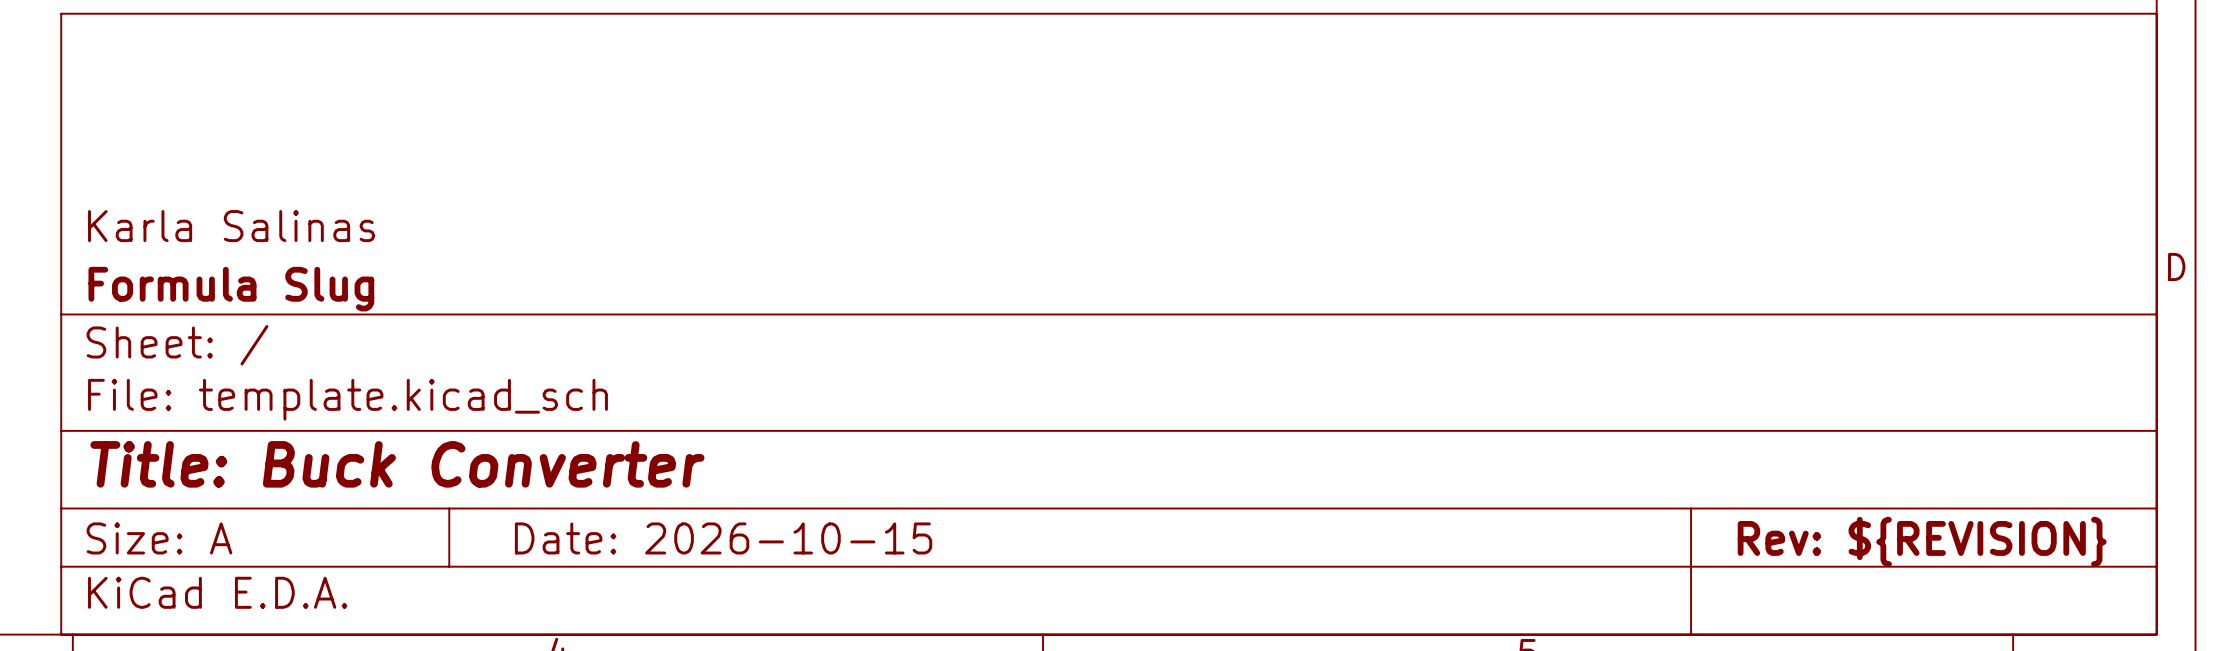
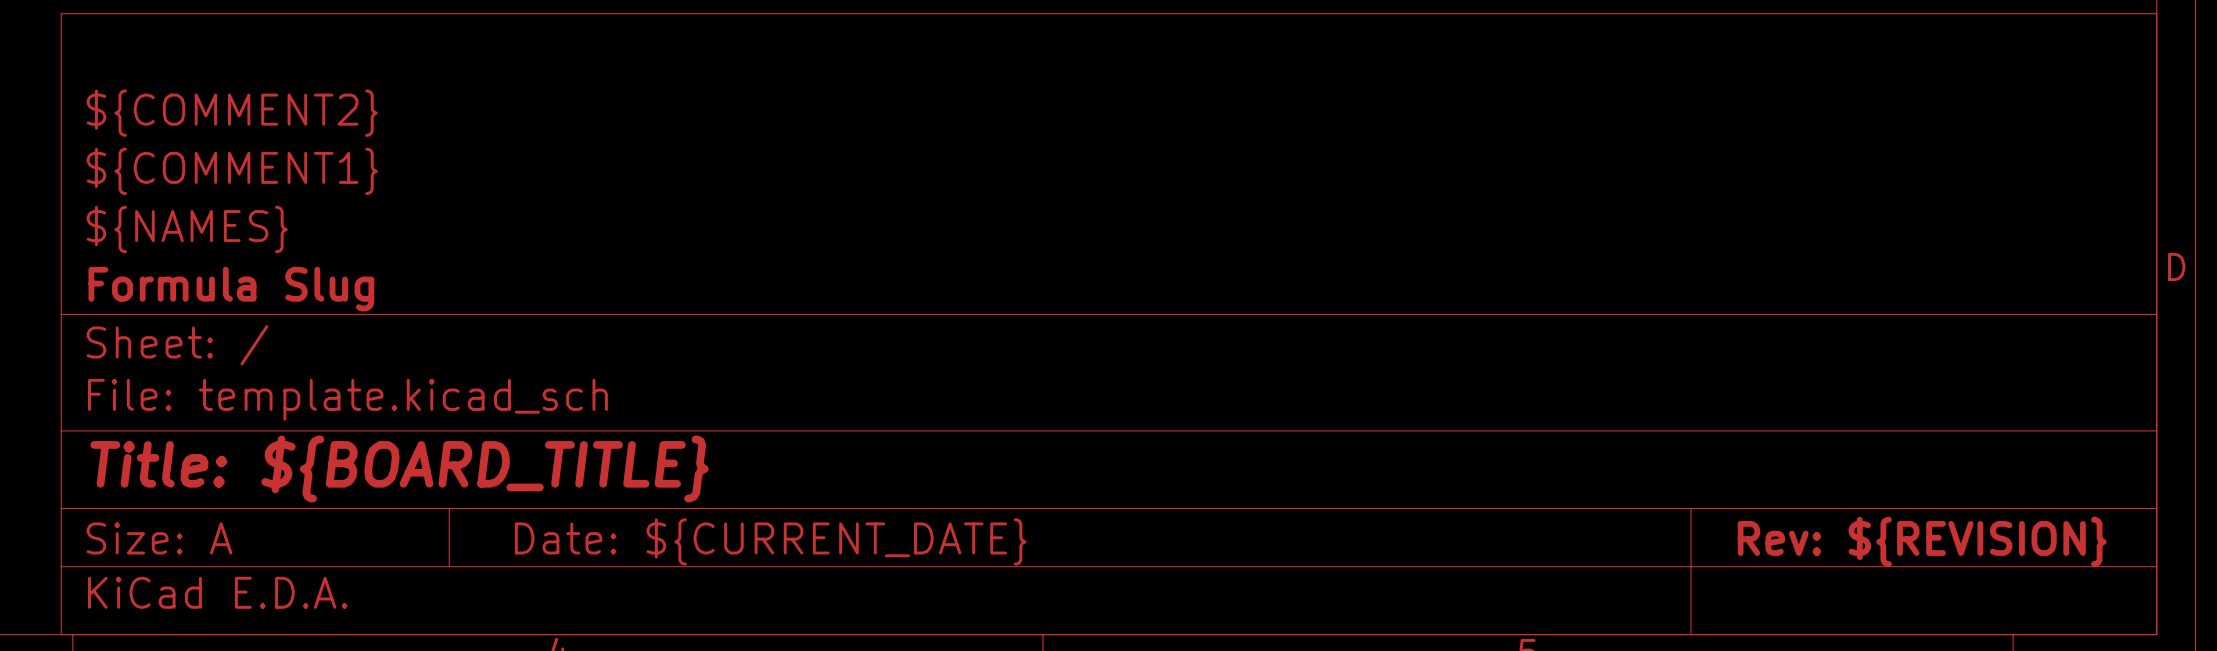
title block: none -> ${COMMENT2} (232, 113)
title block: none -> ${COMMENT1} (232, 171)
title block: Karla Salinas (231, 226) -> ${NAMES} (187, 229)
title block: Title: Buck Converter (397, 464) -> Title: ${BOARD_TITLE} (399, 468)
title block: Date: 2026-10-15 (723, 538) -> Date: ${CURRENT_DATE} (770, 541)

